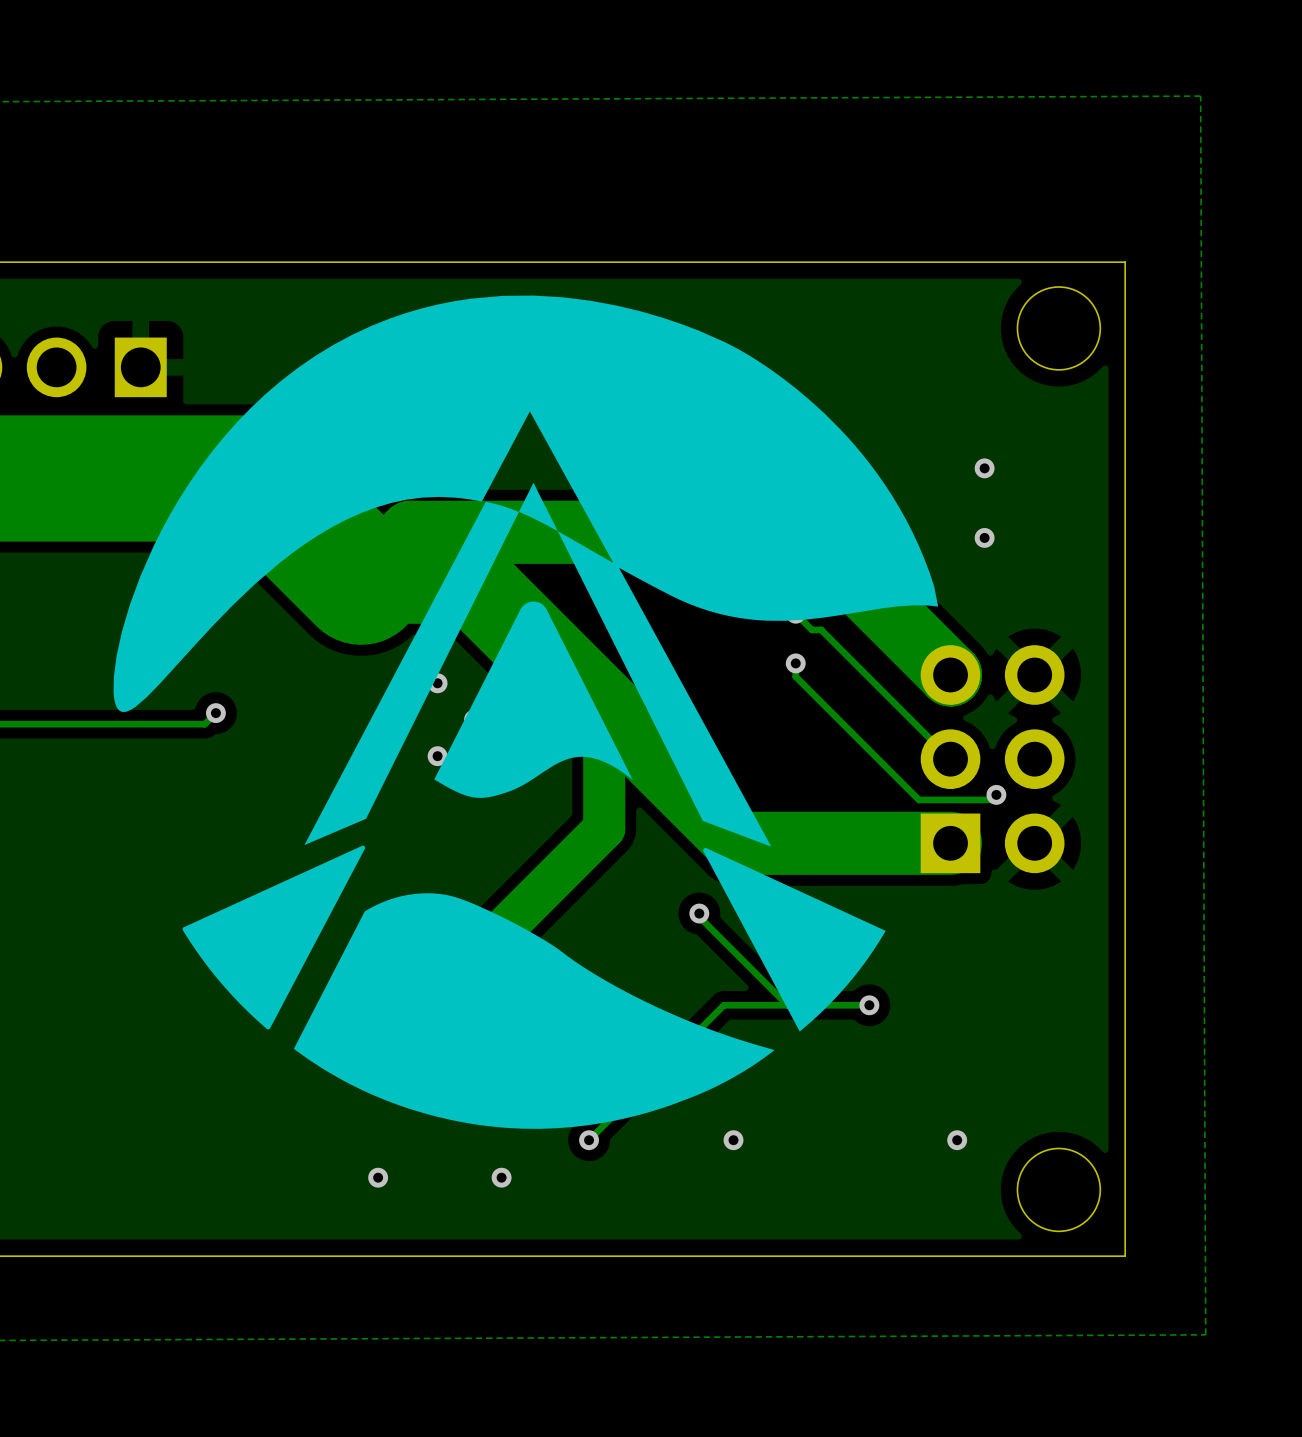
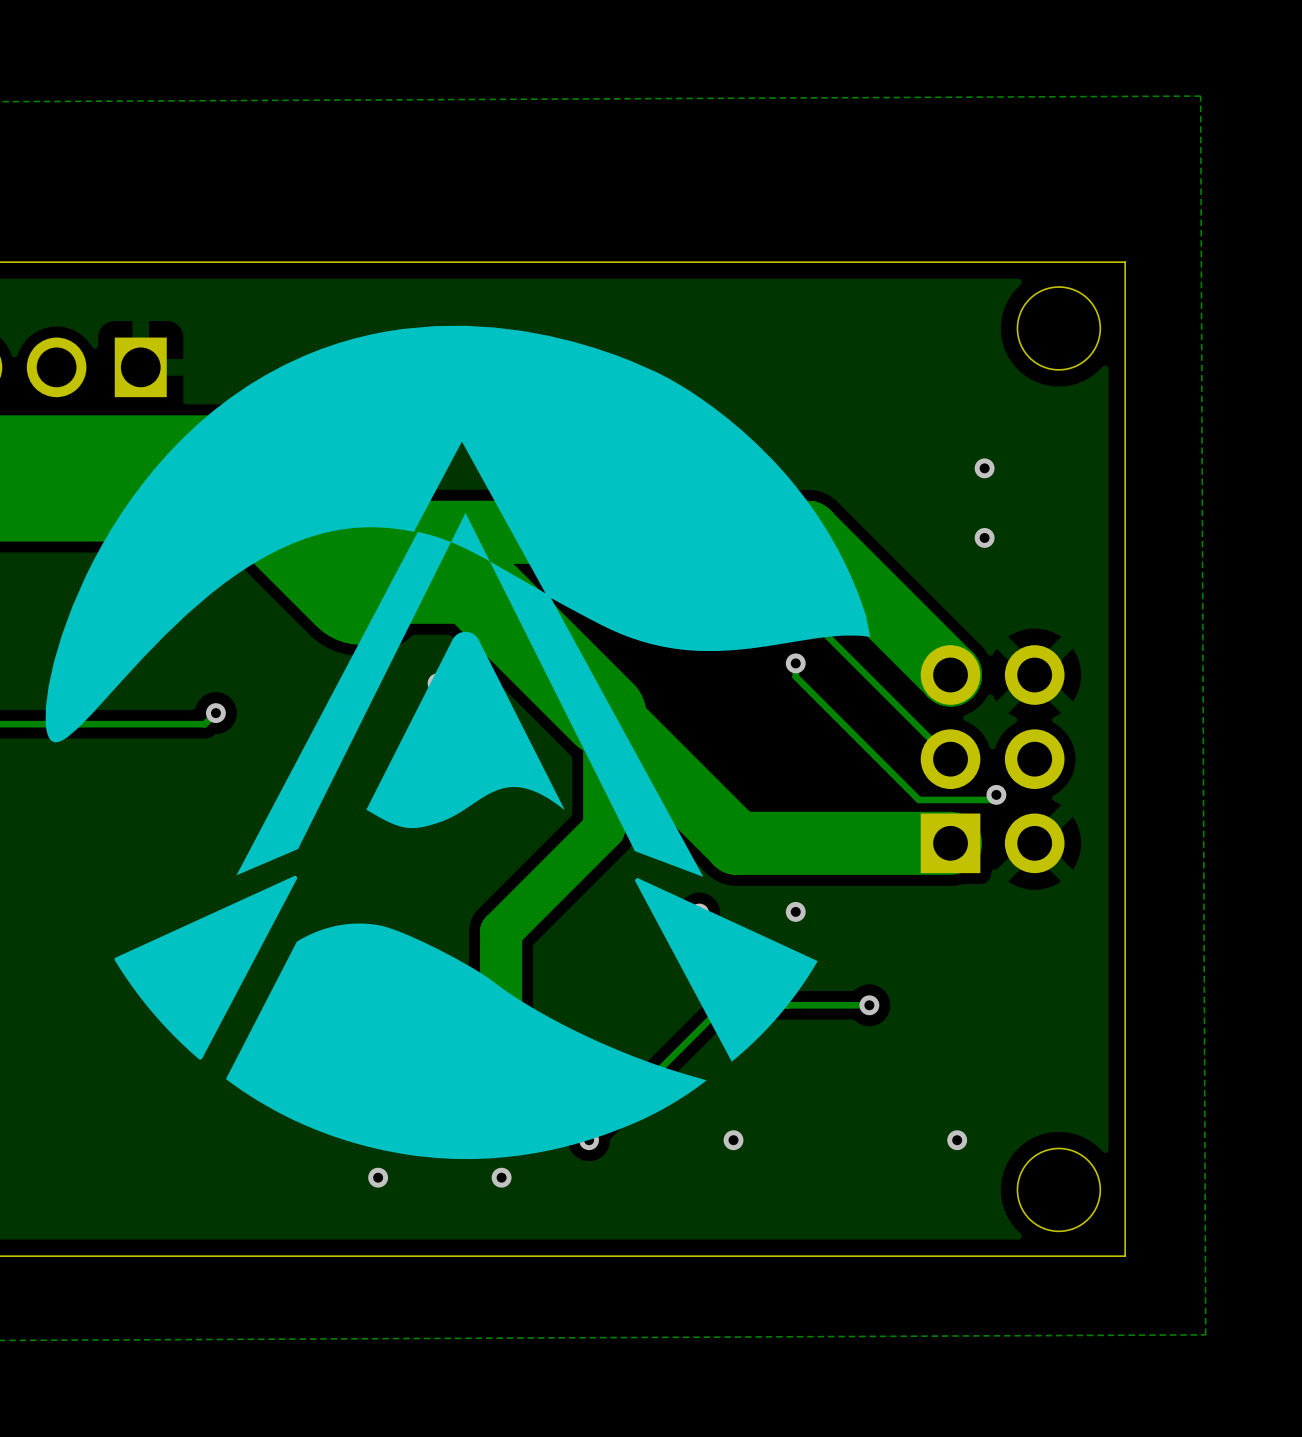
drawing position: (525, 503) -> (457, 534)
drawing position: (538, 506) -> (470, 537)
drawing position: (643, 658) -> (575, 689)
drawing position: (411, 673) -> (343, 703)
drawing position: (533, 699) -> (465, 729)
drawing position: (728, 808) -> (660, 838)
drawing position: (273, 937) -> (205, 967)
drawing position: (794, 939) -> (726, 969)
drawing position: (534, 1011) -> (466, 1041)

